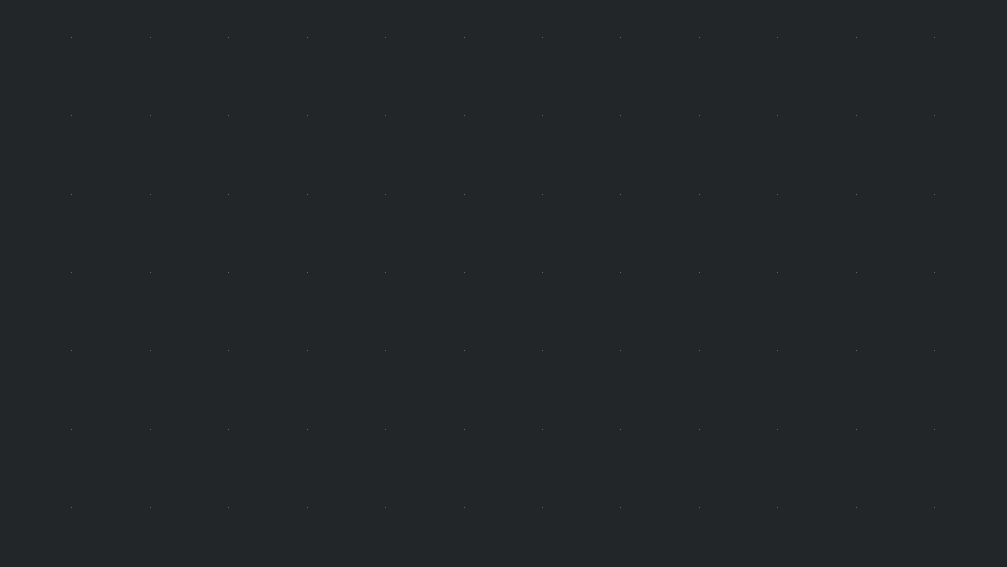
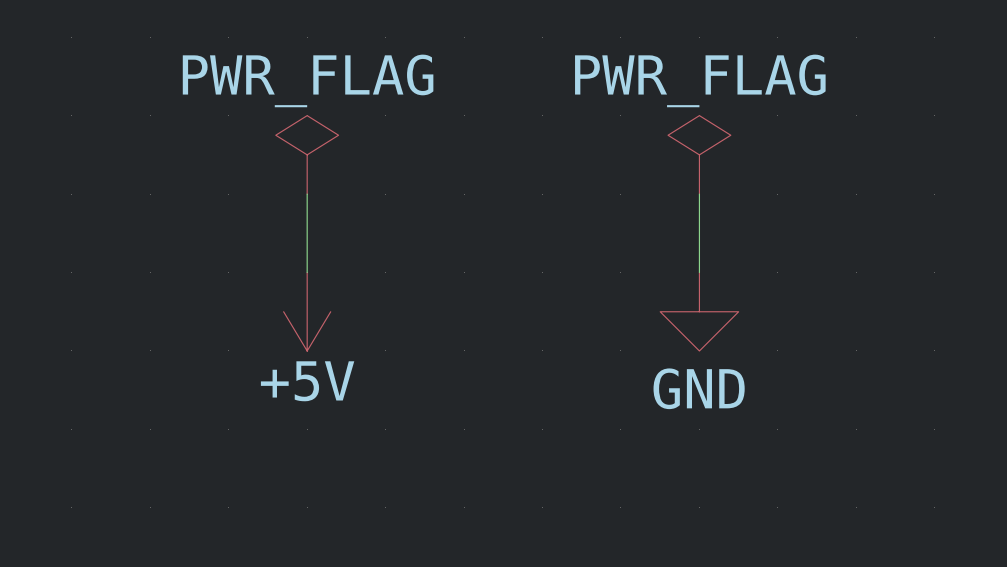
power symbol: none -> PWR_FLAG (307, 154)
power symbol: none -> PWR_FLAG (699, 154)
wire: none -> (307, 194) (307, 272)
wire: none -> (699, 194) (699, 272)
power symbol: none -> +5V (307, 311)
power symbol: none -> GND (699, 311)

